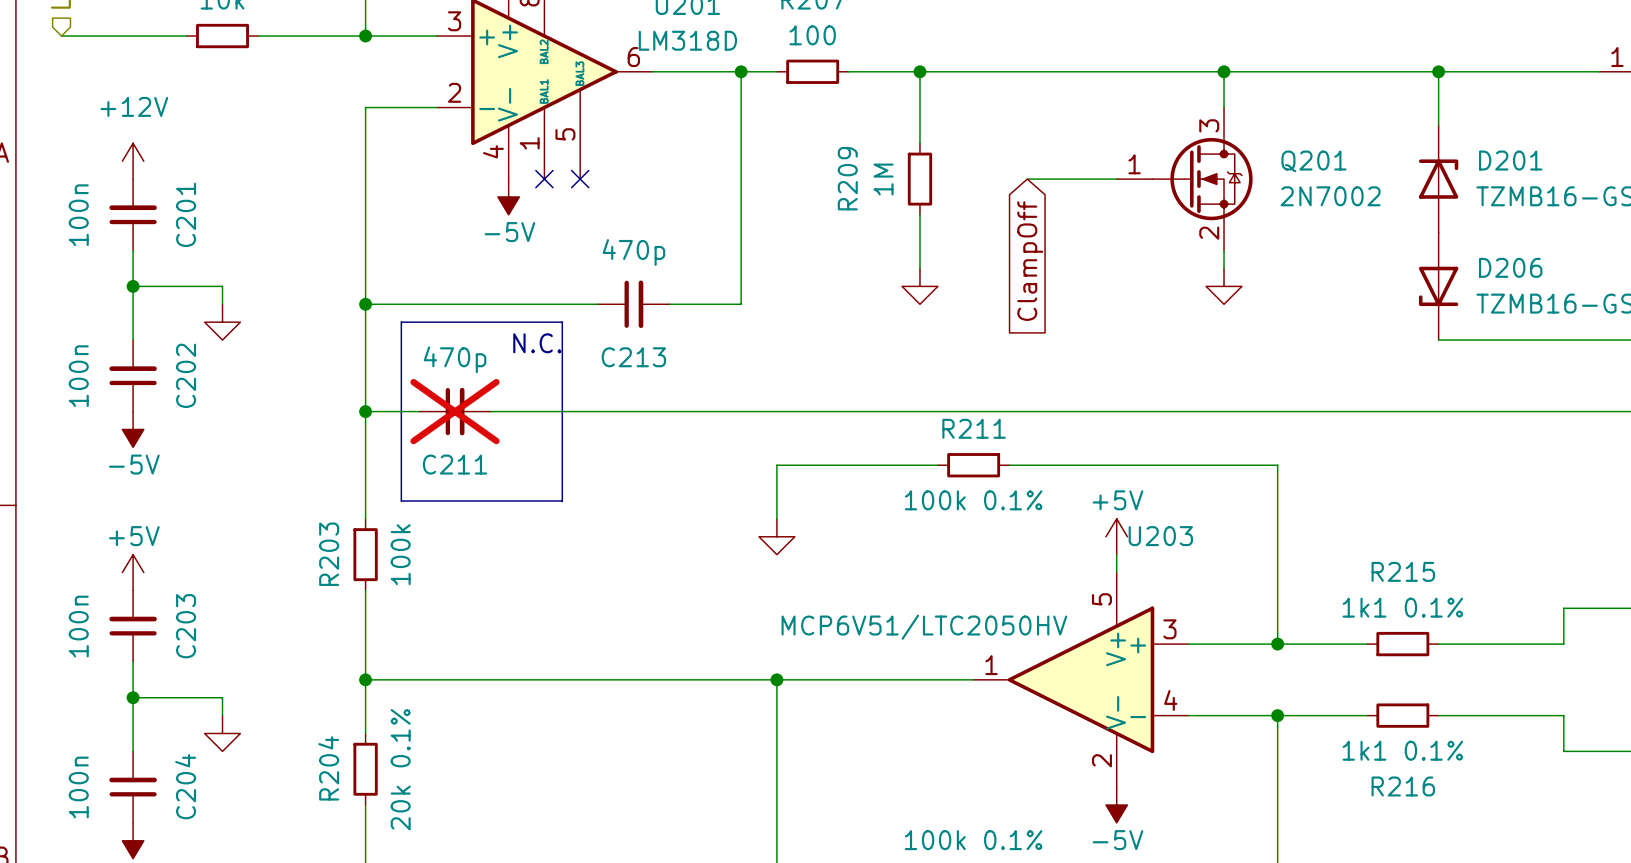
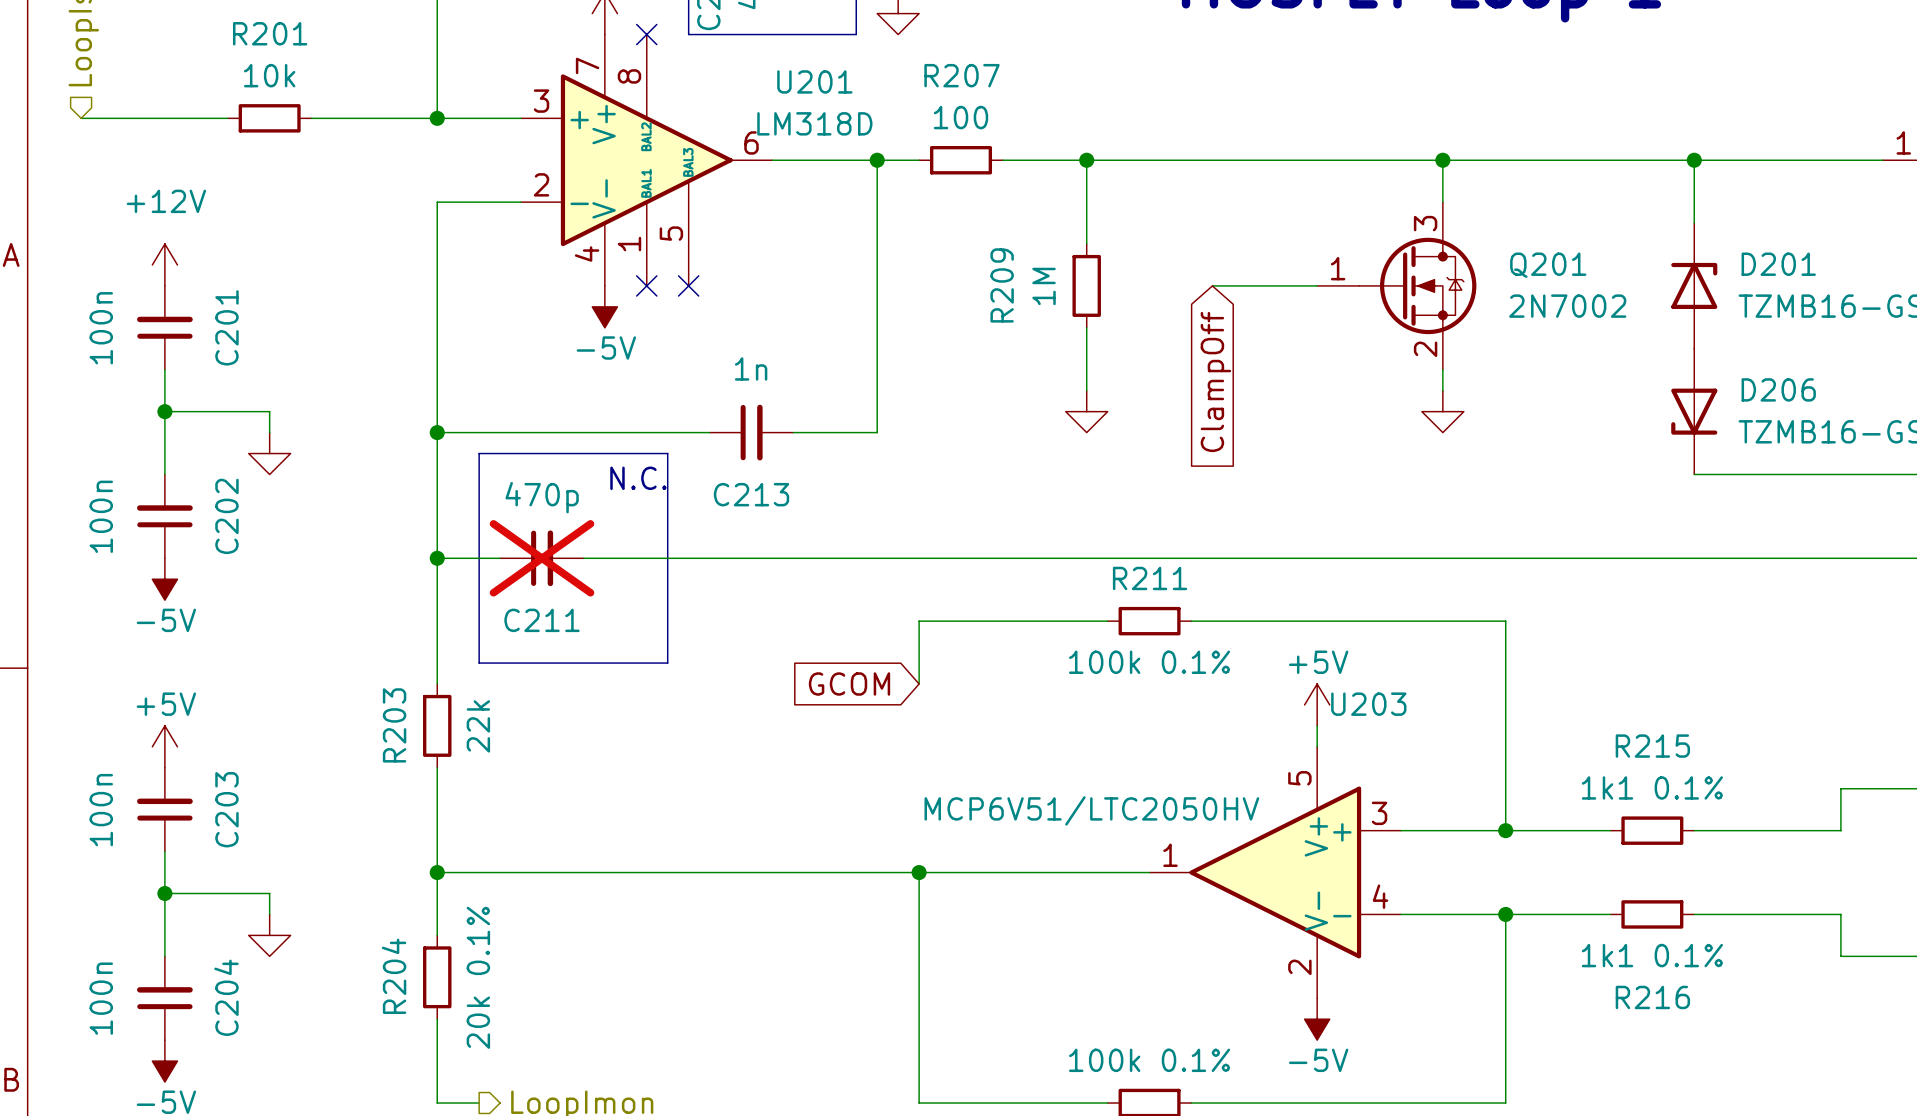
C213 value: 470p (633, 252) -> 1n (751, 368)
global label: none -> GCOM (849, 684)
power symbol: (776, 536) -> none
R203 value: 100k (400, 554) -> 22k (478, 726)

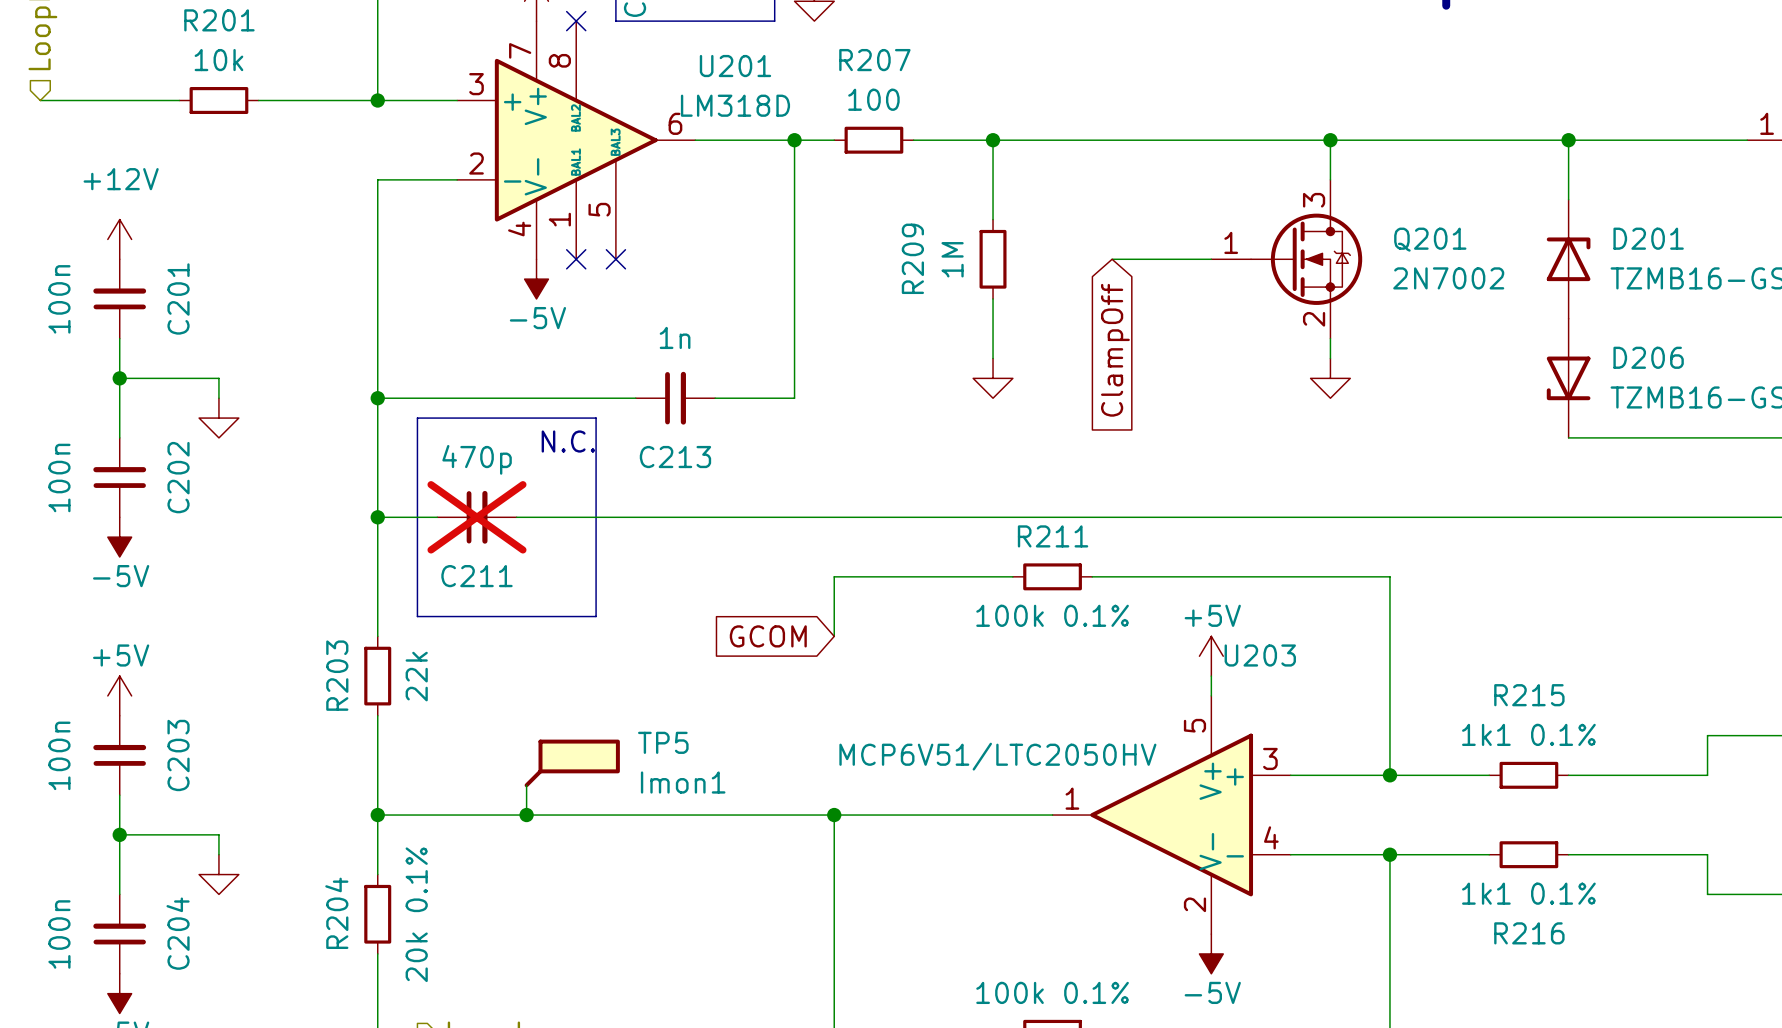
TP5: none -> Imon1 (572, 763)
wire: none -> (526, 785) (526, 815)
junction: none -> (526, 815)

